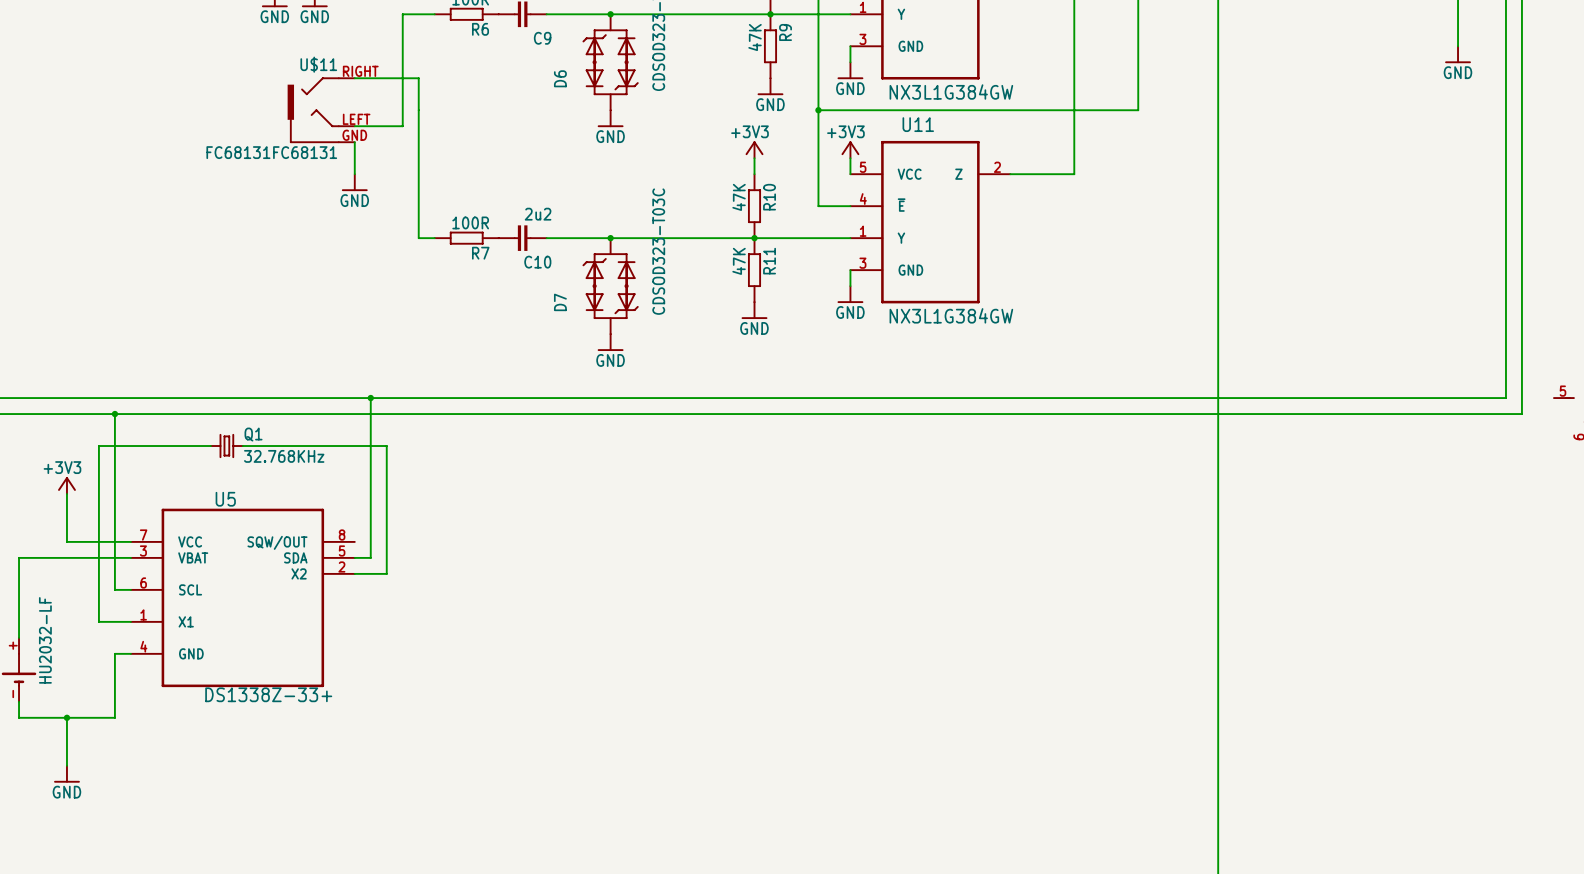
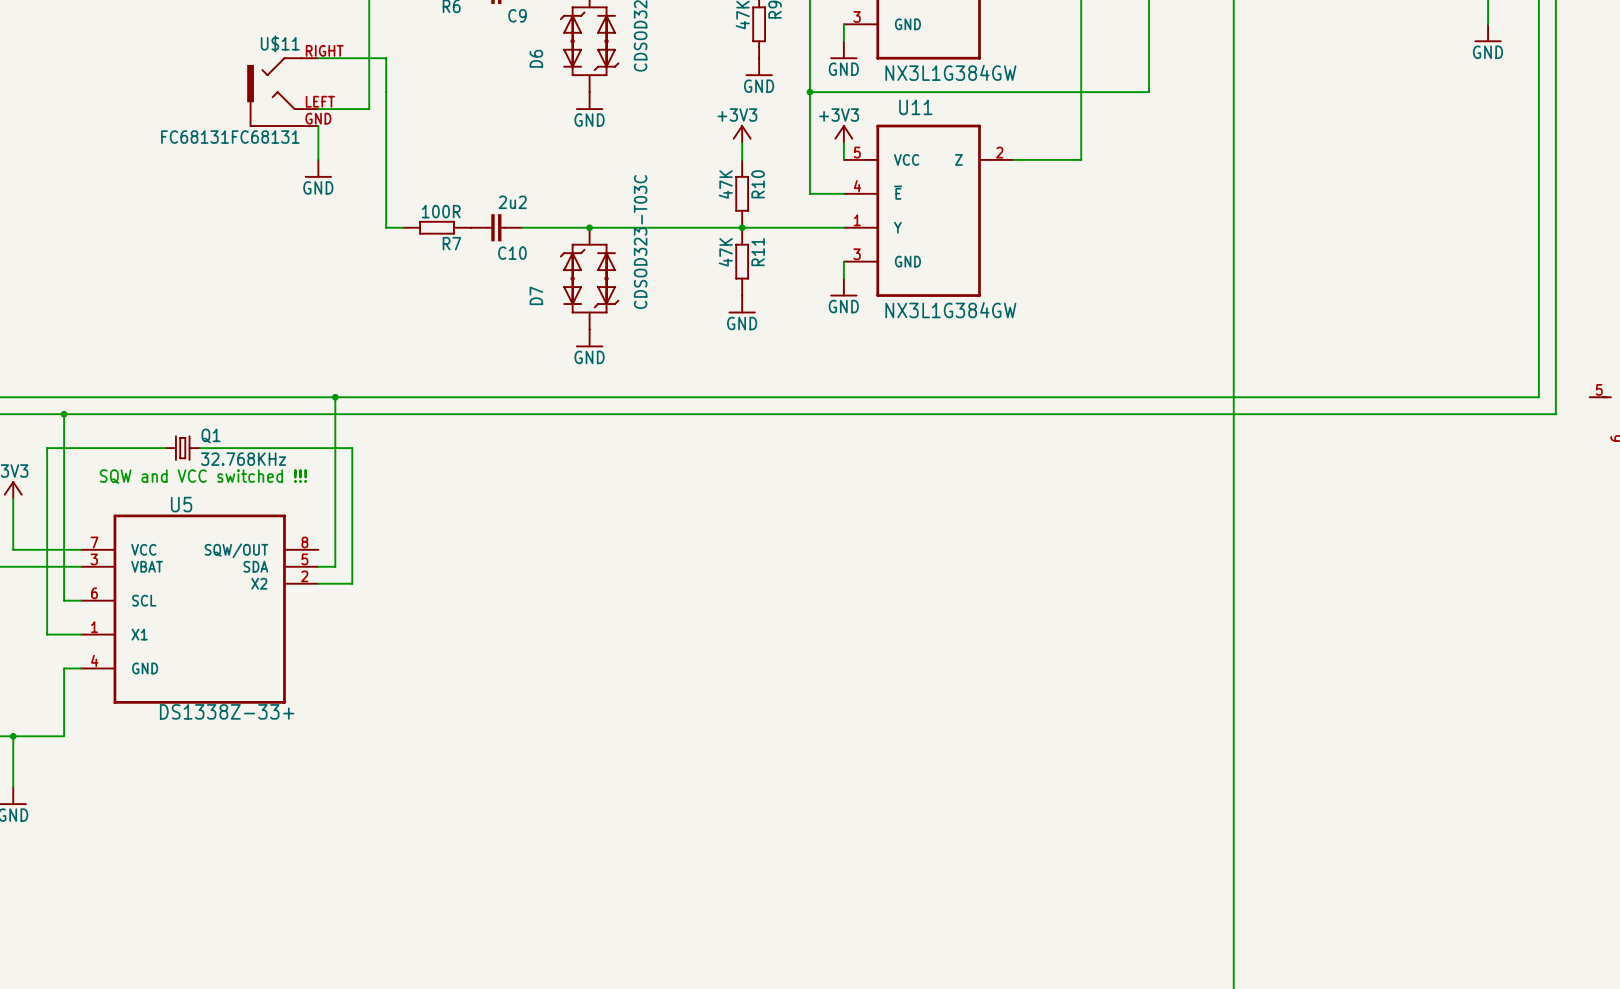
text: none -> SQW and VCC switched !!! (203, 476)

